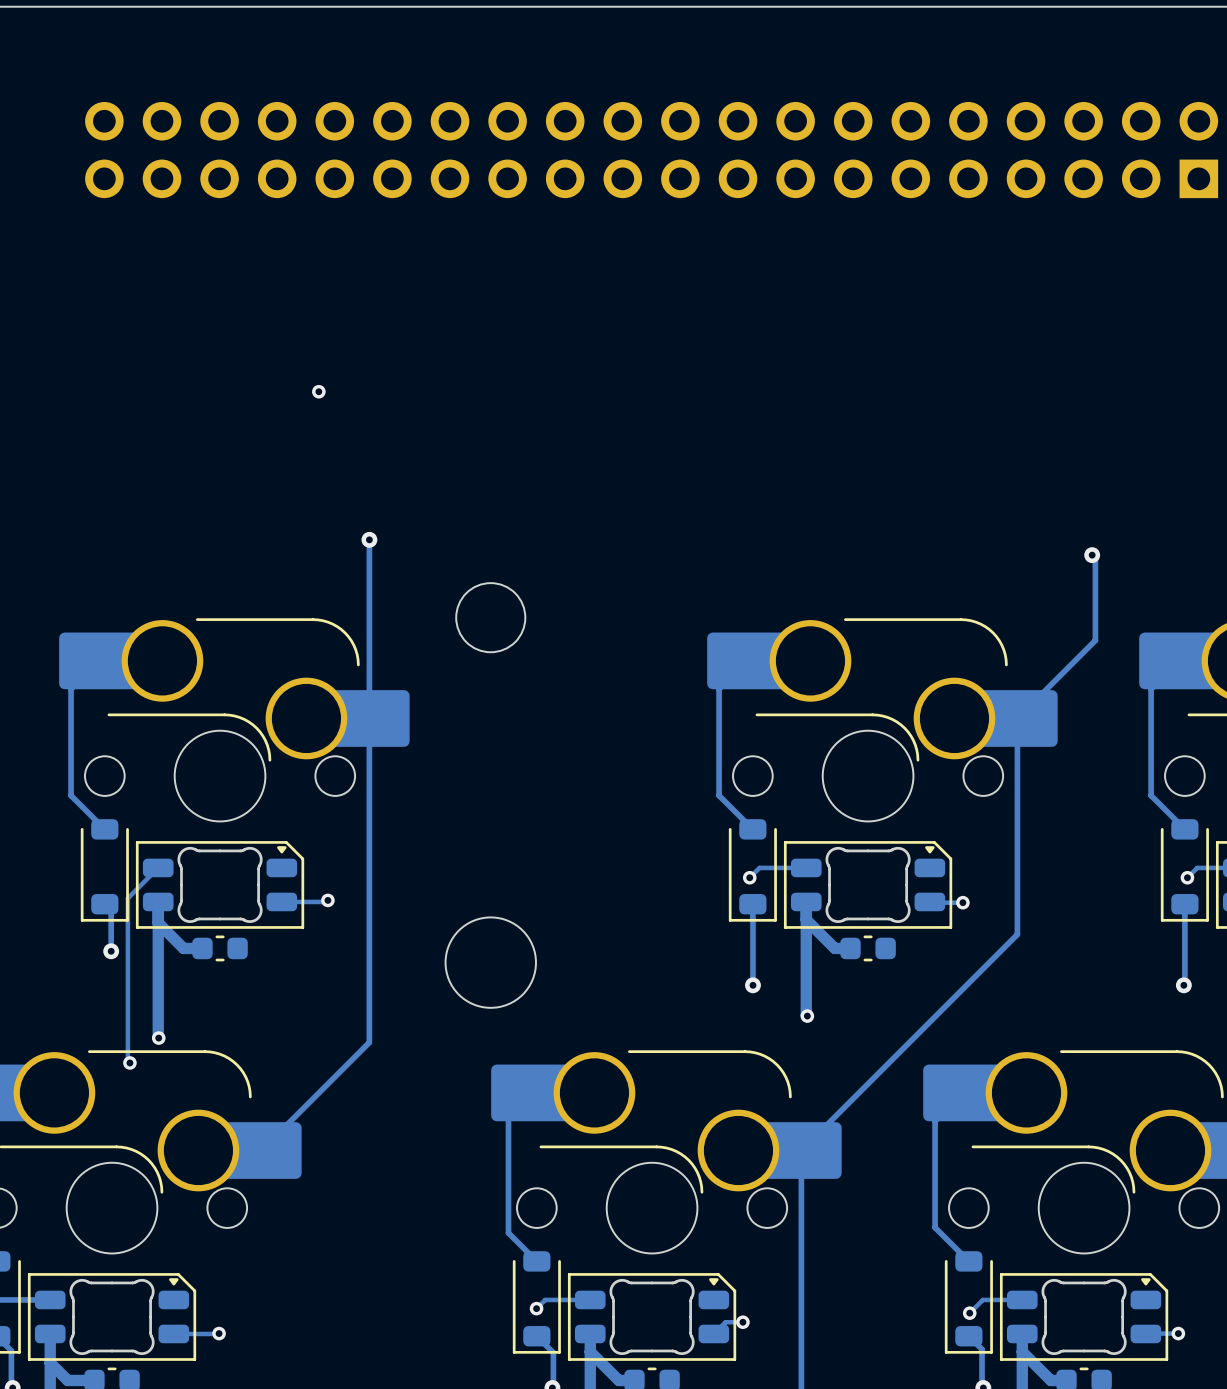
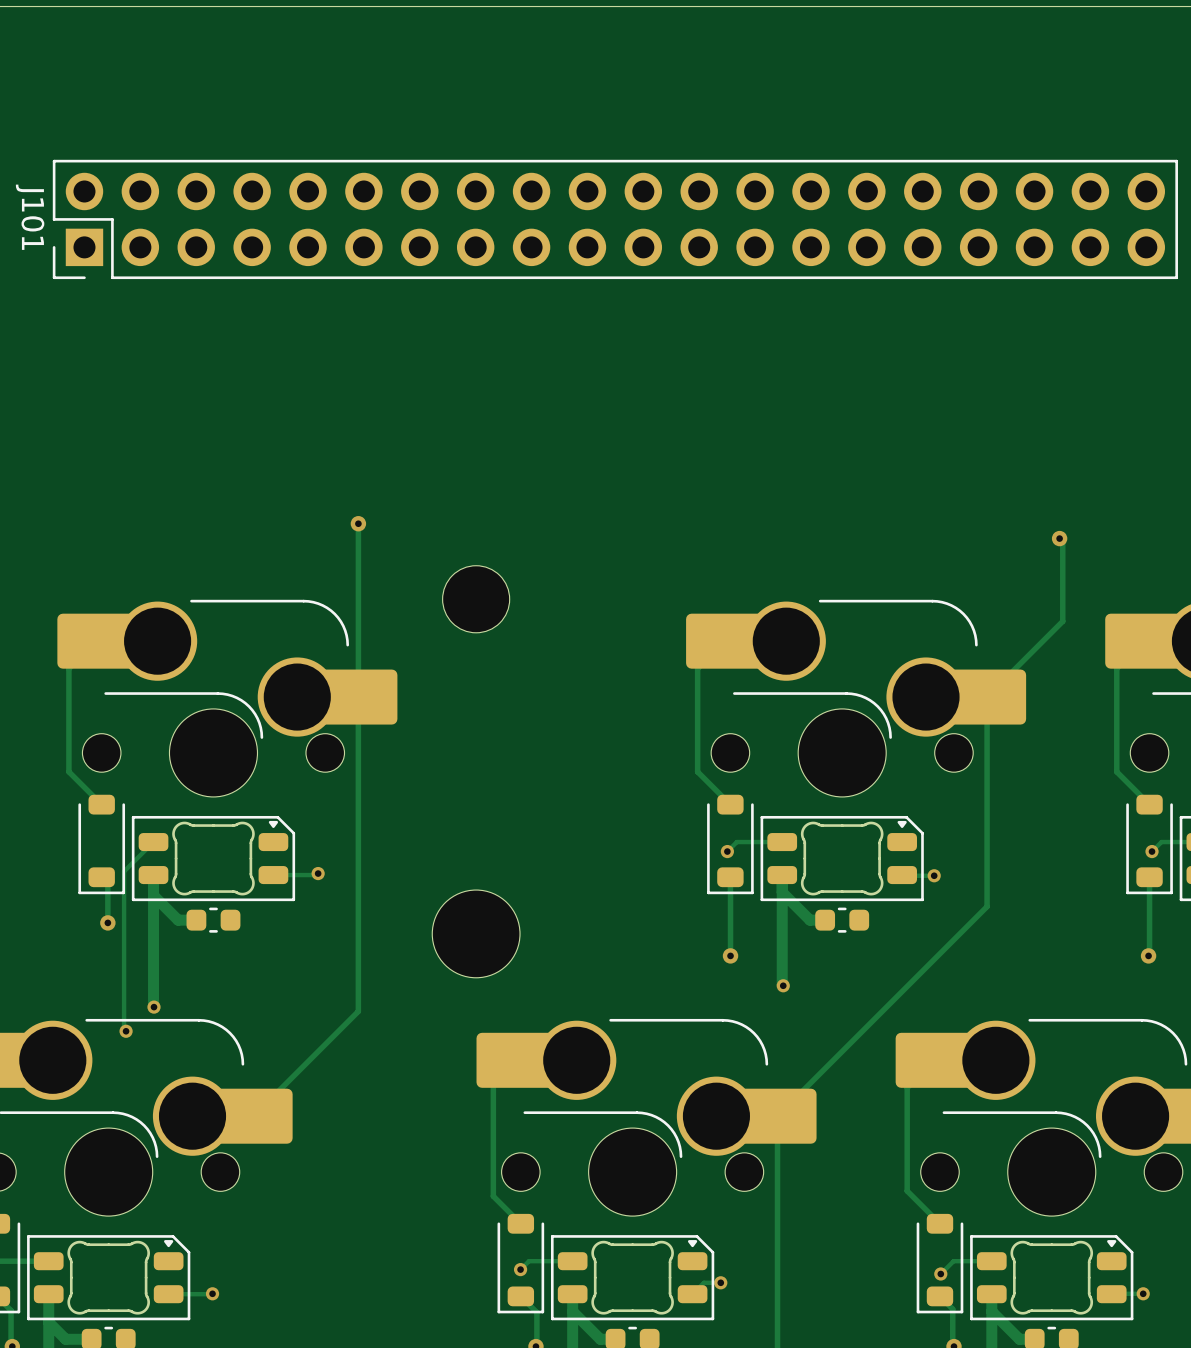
J101 side: top (651, 150) -> bottom (615, 219)
via: (318, 391) -> none

